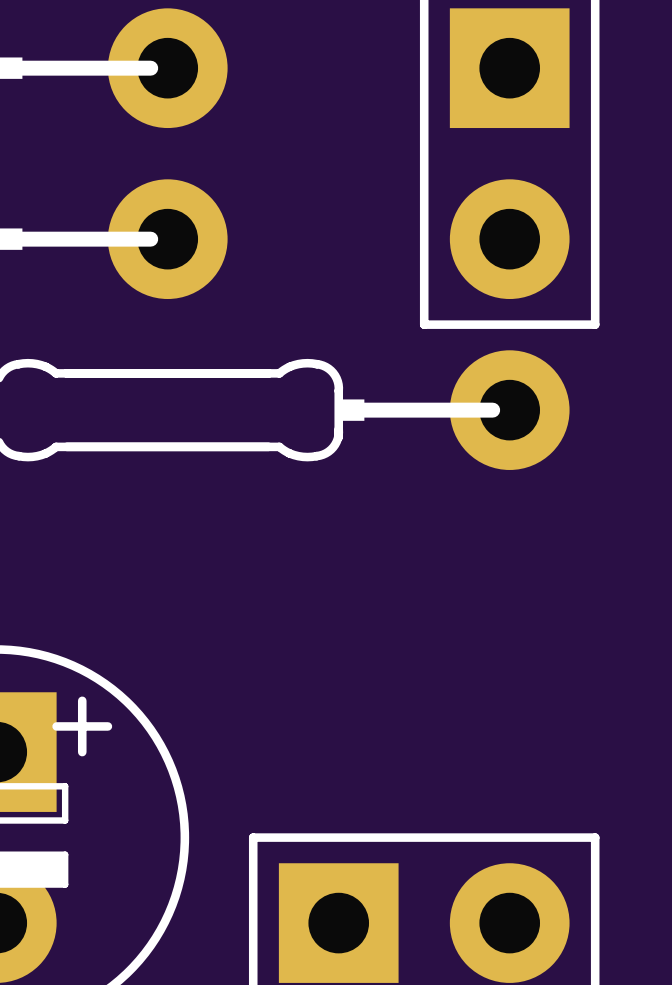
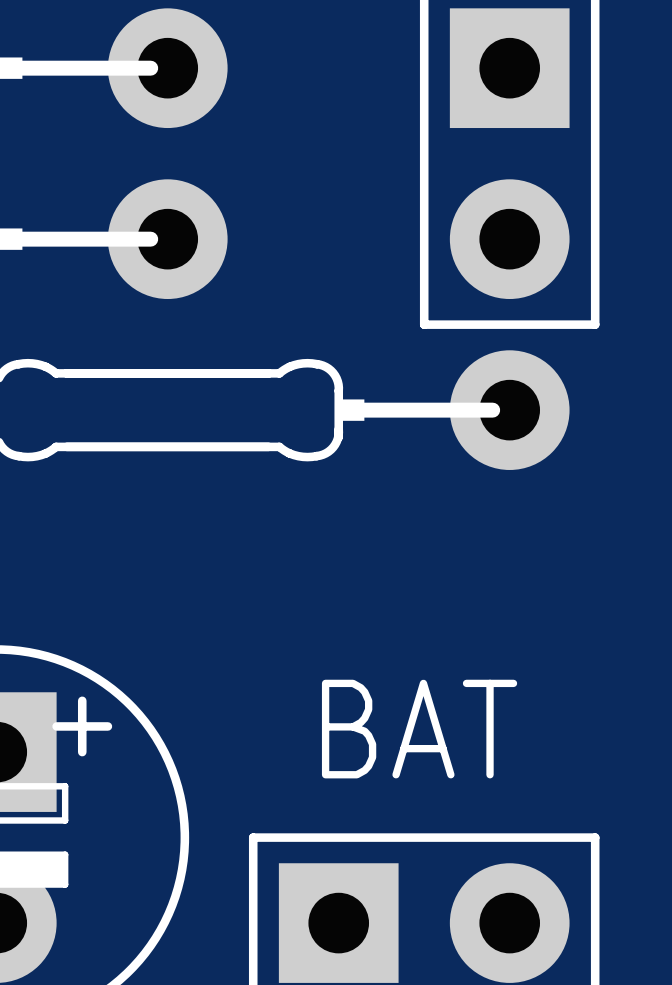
BAT name: none -> BAT (419, 729)

